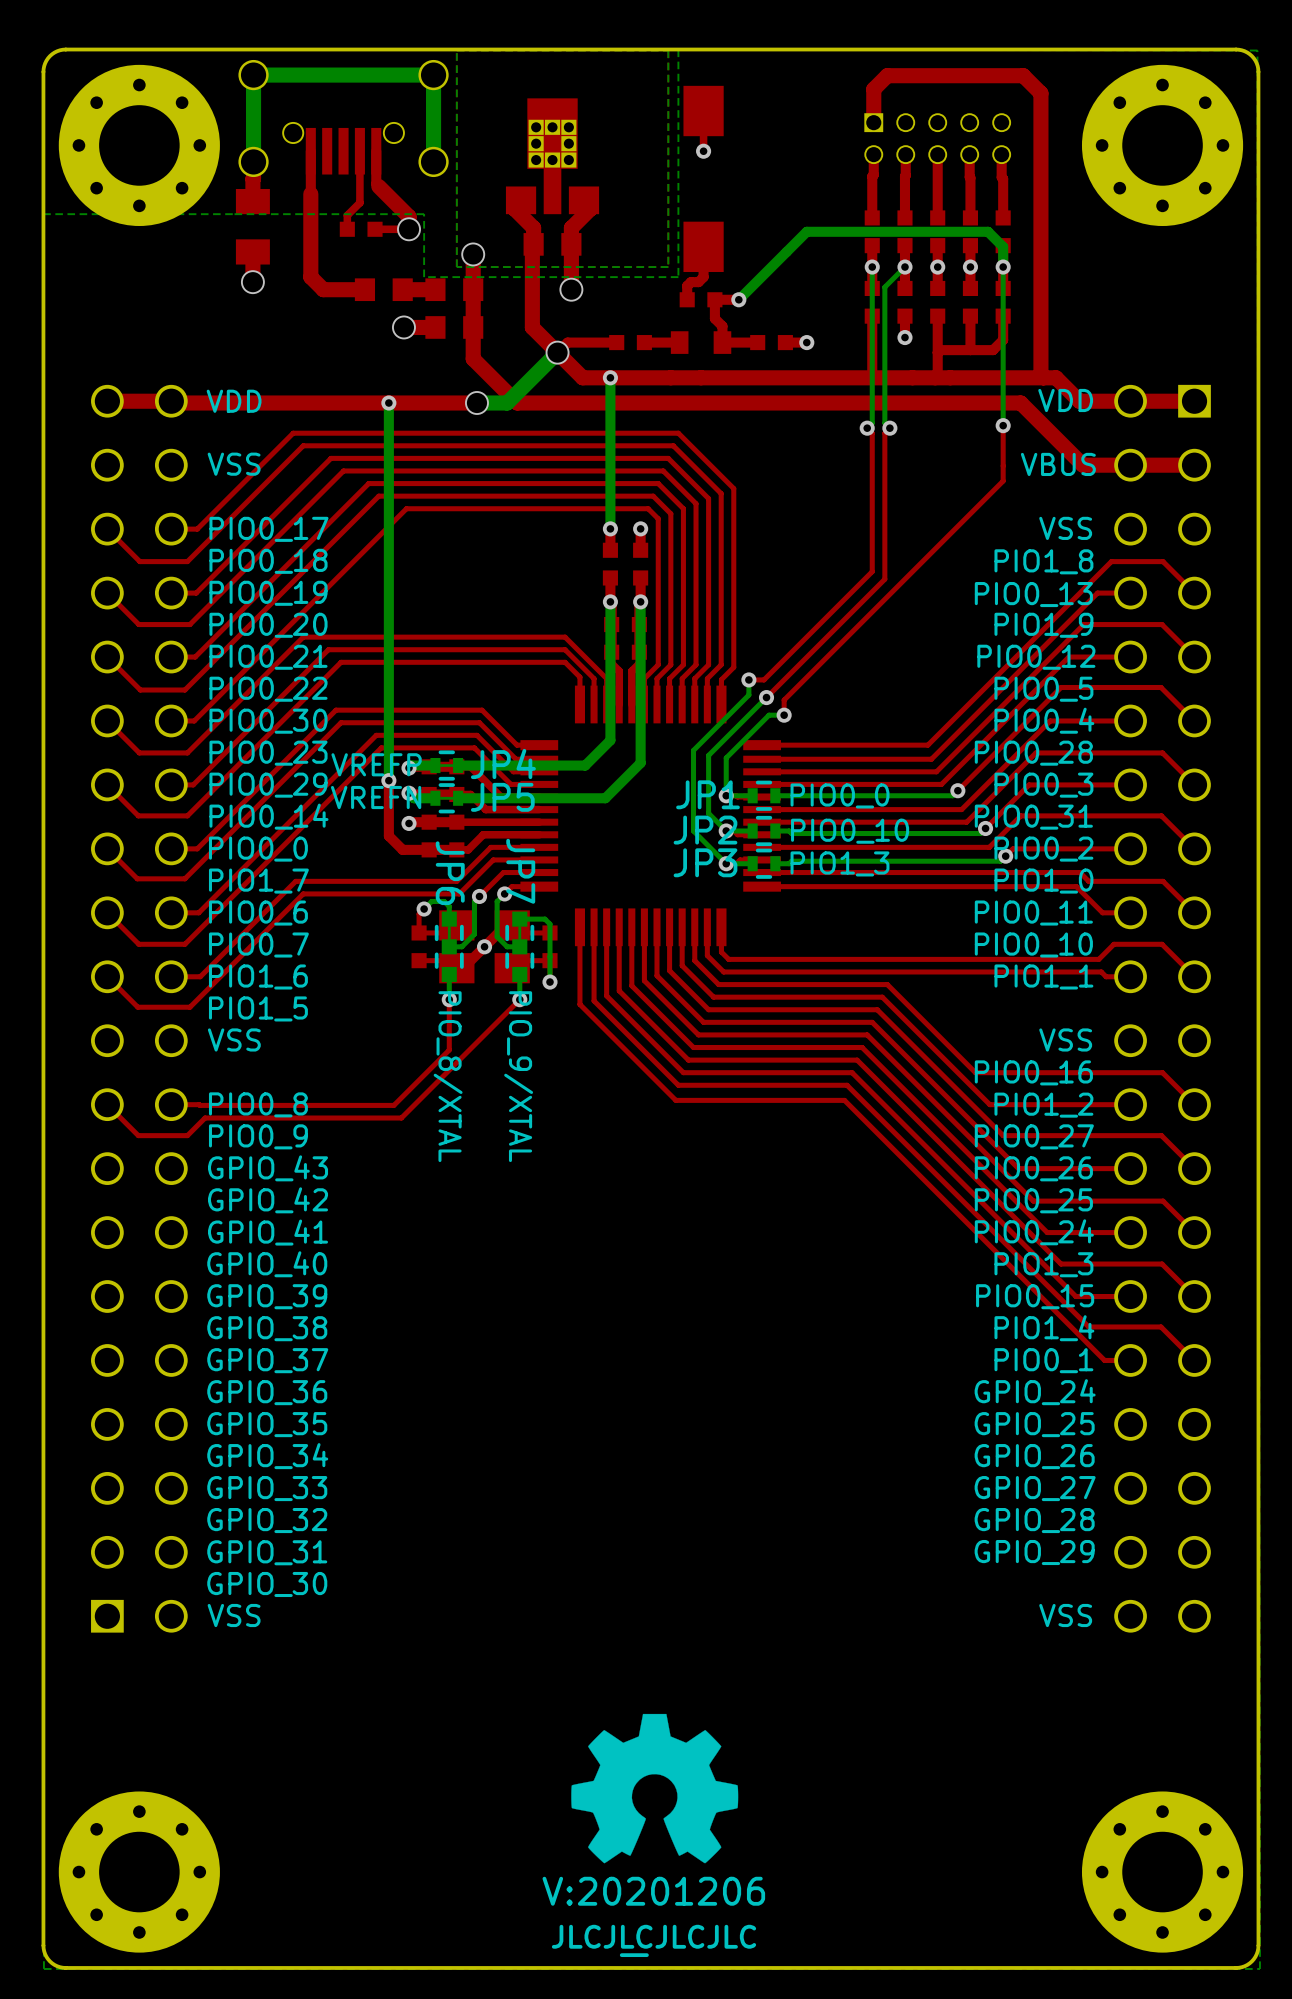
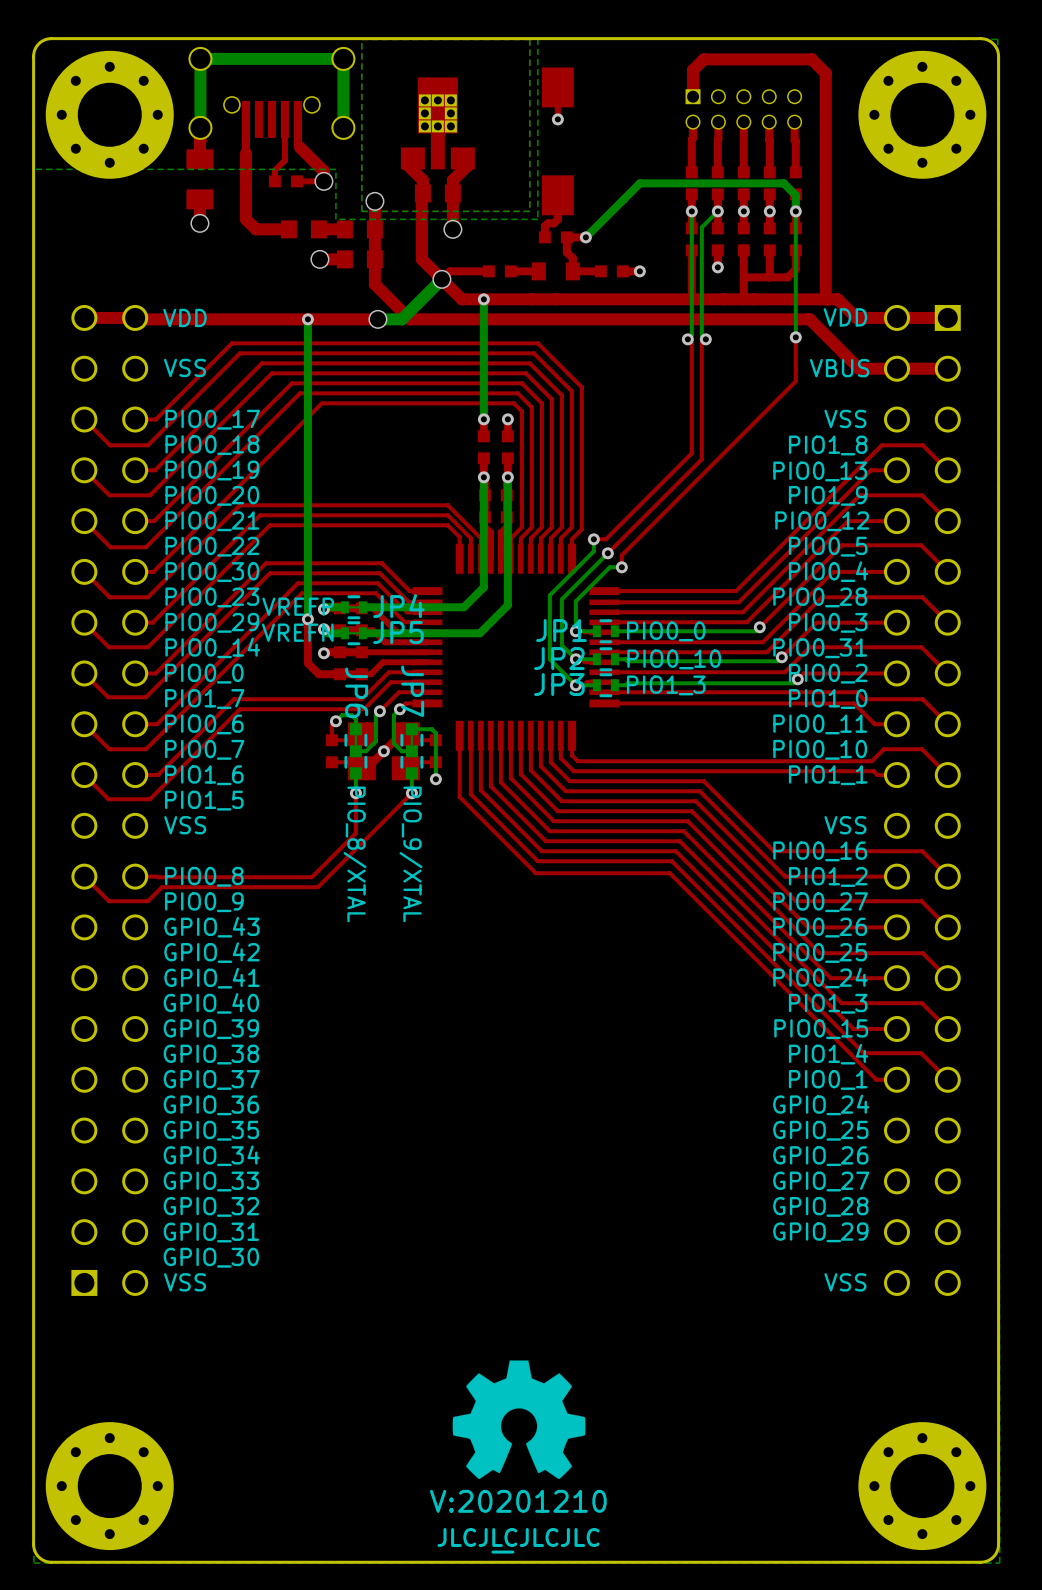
drawing shape: [542, 1876, 766, 1906] -> [429, 1489, 607, 1513]

